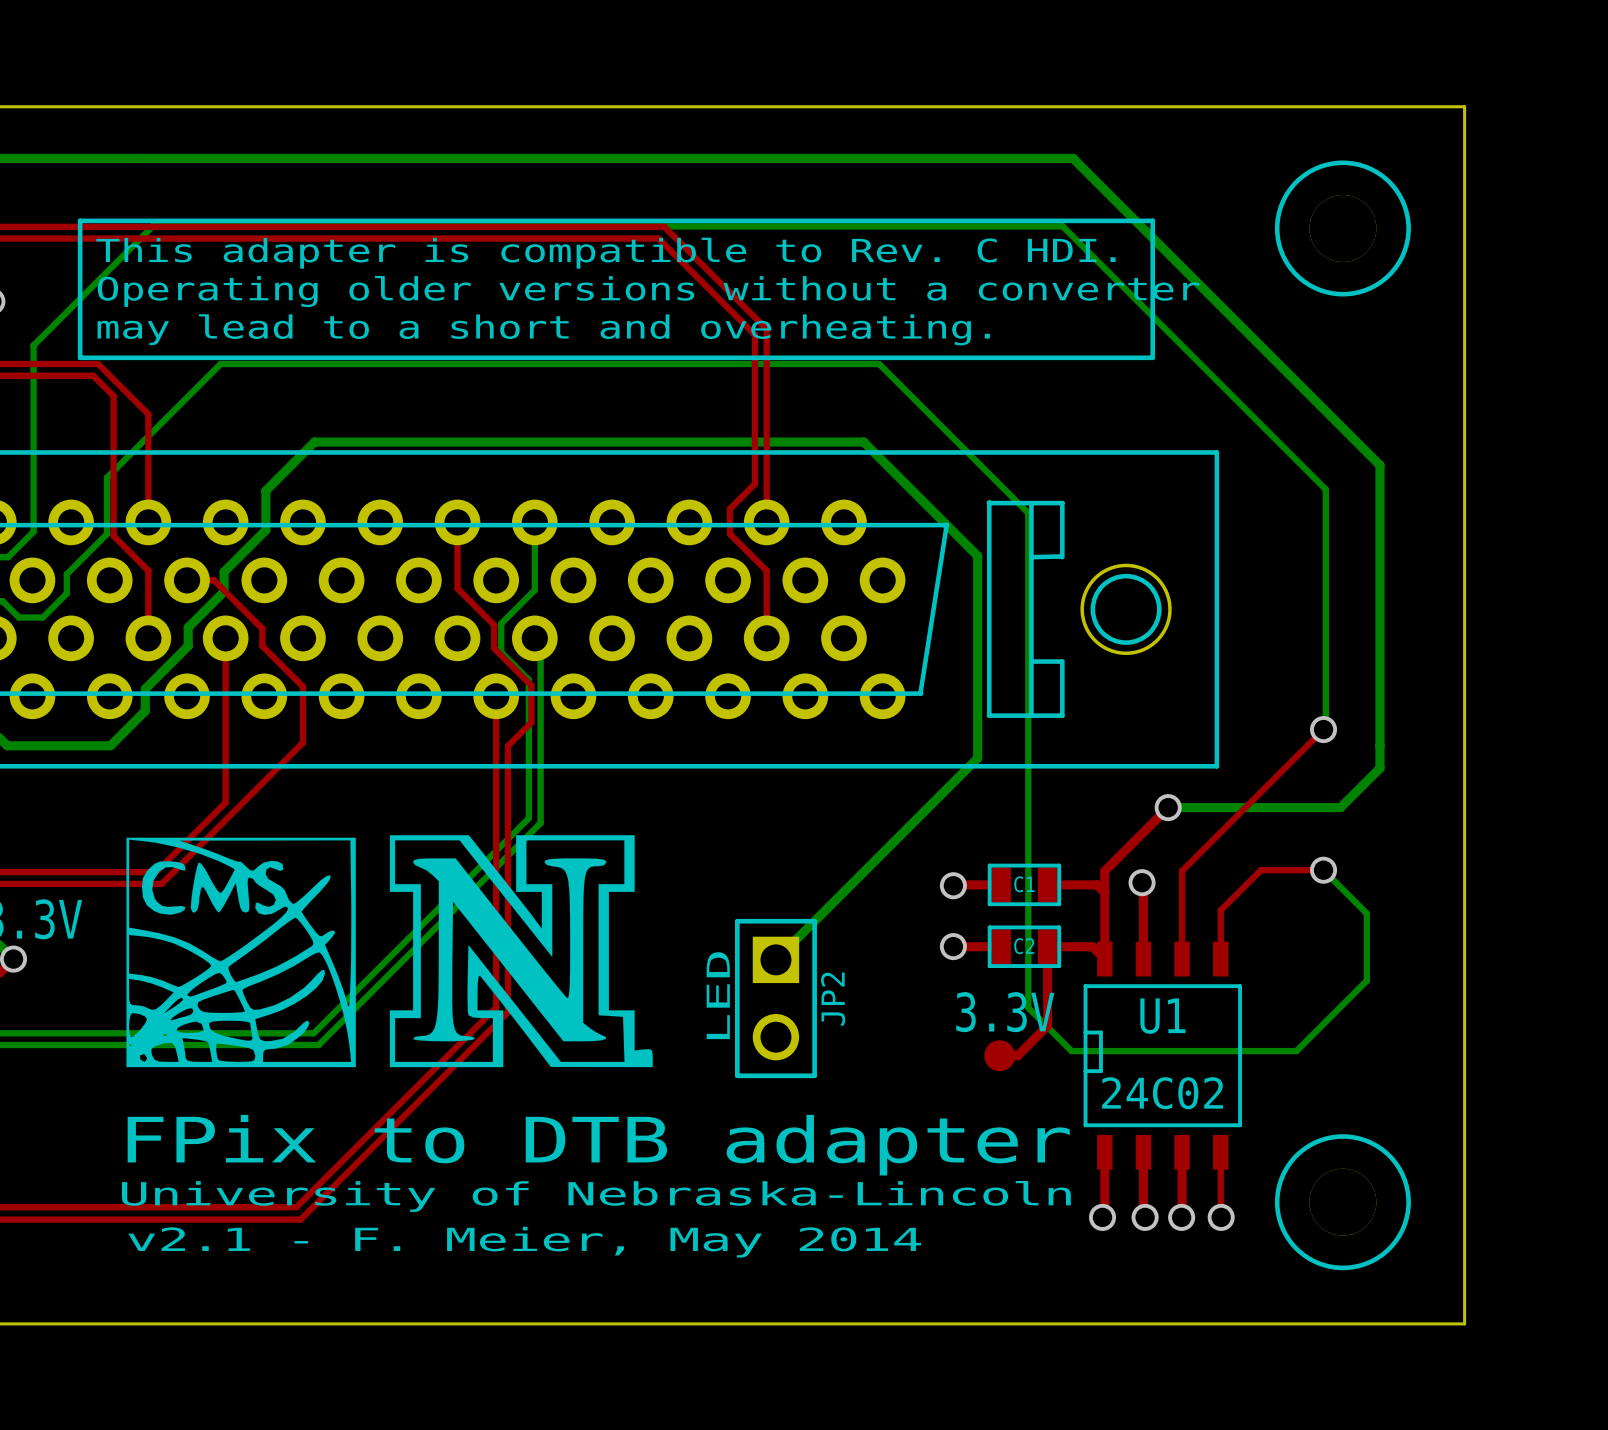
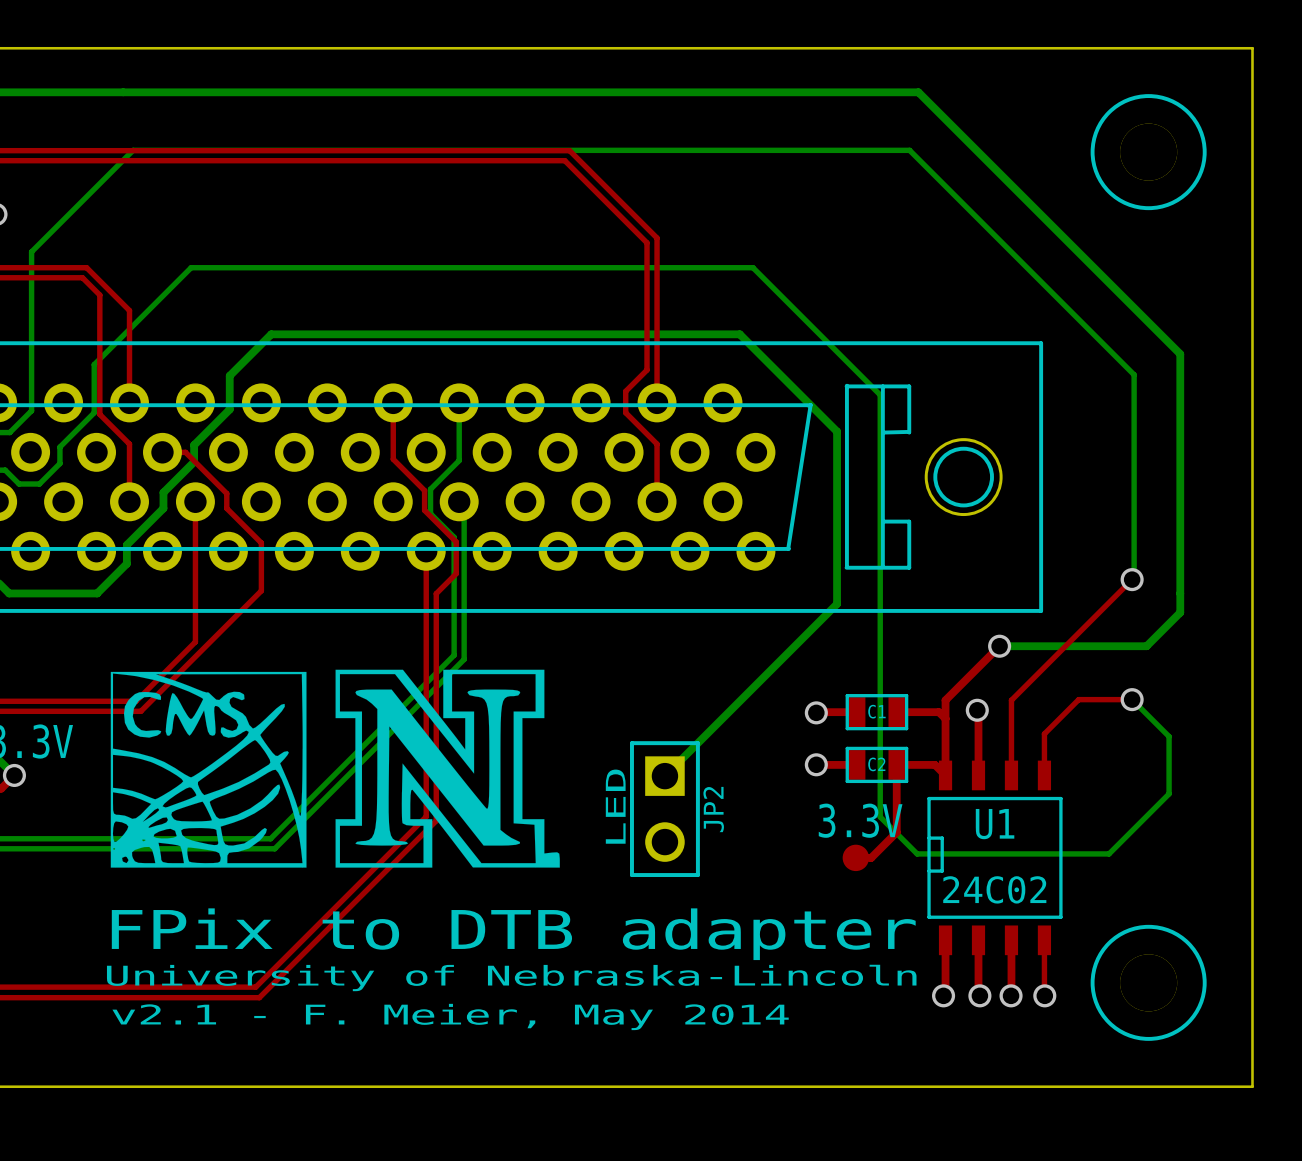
line: (80, 220) (80, 357) (1152, 357) (1152, 220) (80, 220) -> none
text: This adapter is compatible to Rev. C HDI. (605, 253) -> none
text: Operating older versions without a converter (648, 291) -> none
text: may lead to a short and overheating. (543, 329) -> none

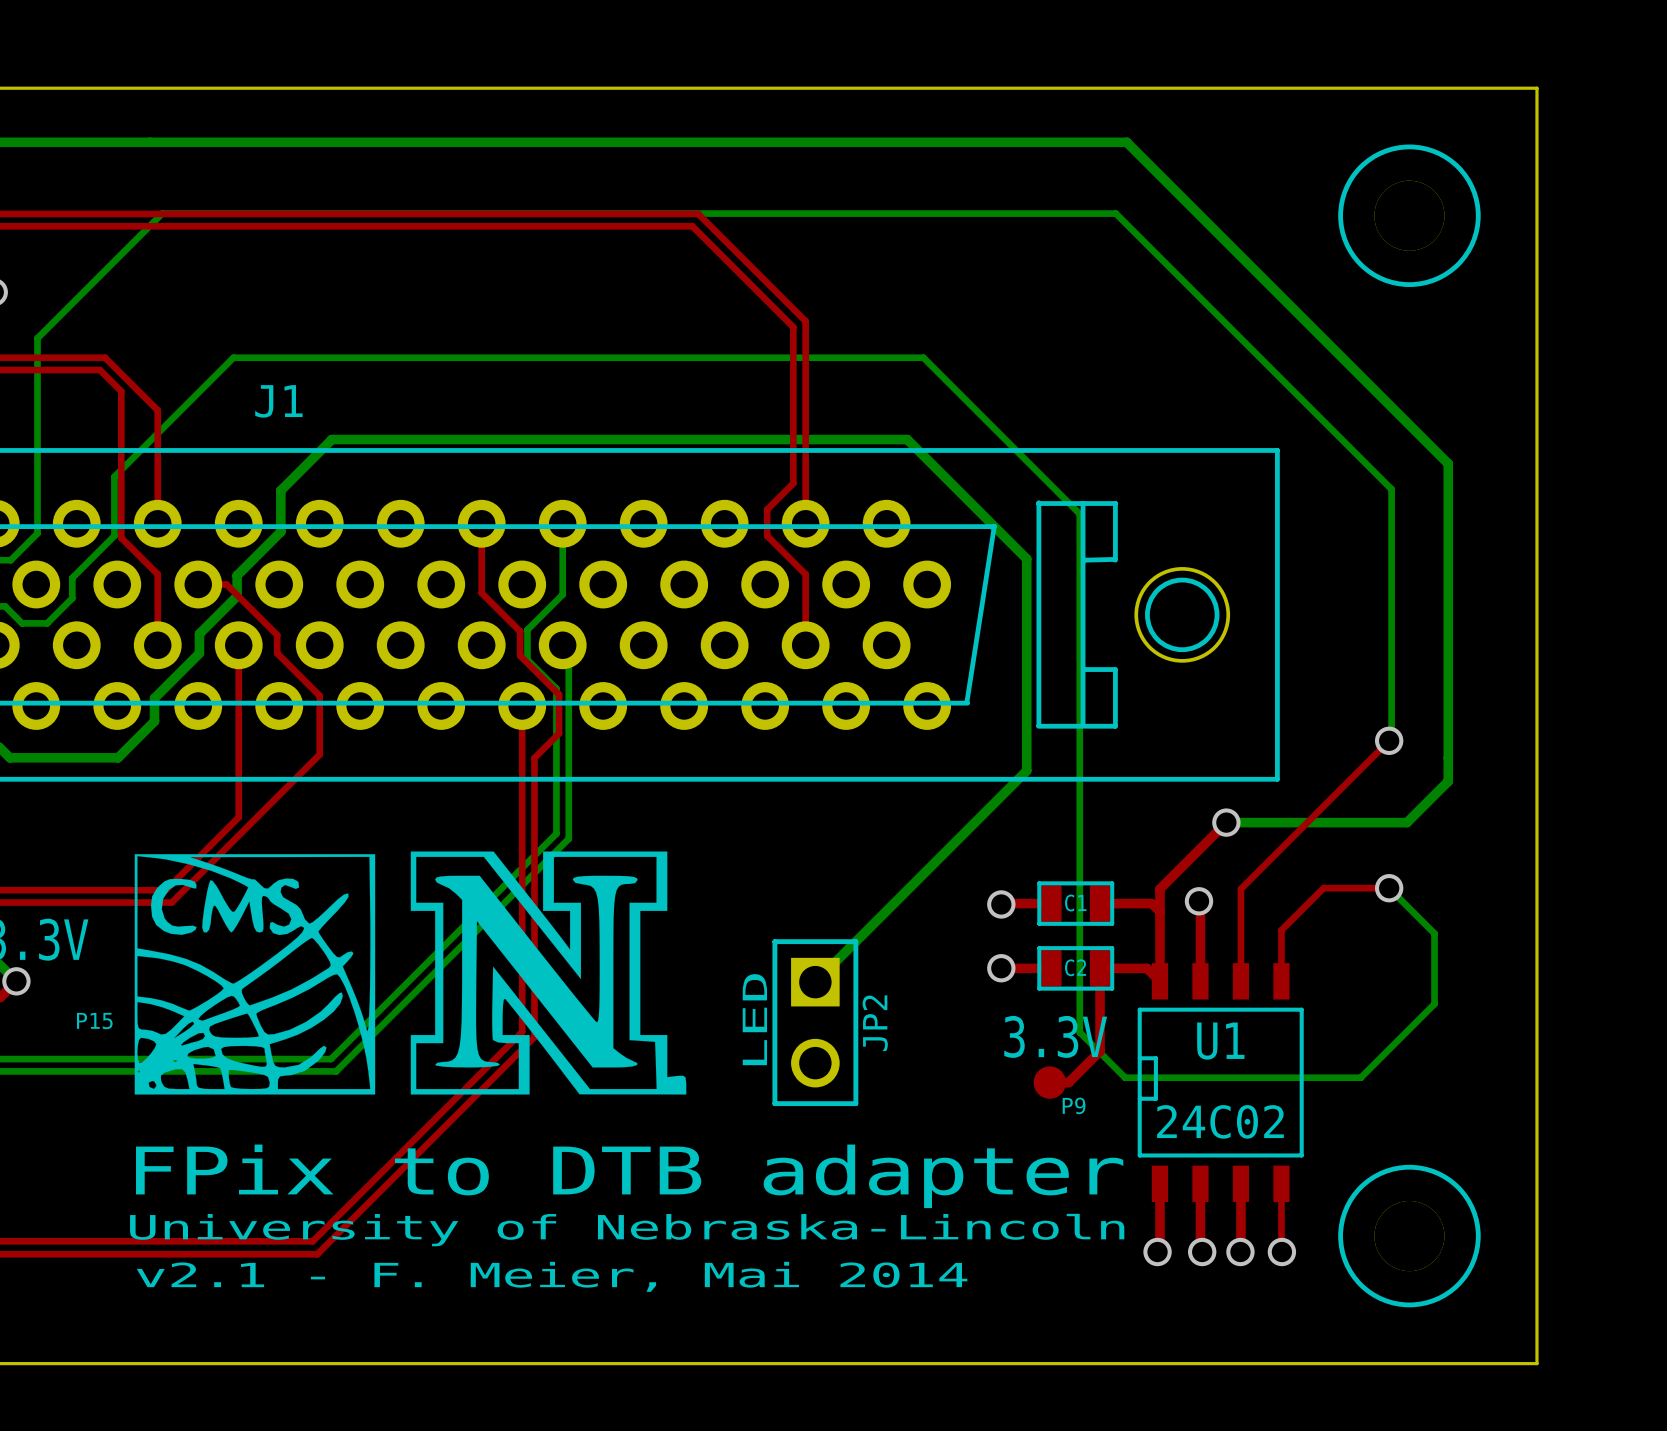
J1 name: none -> J1 (278, 401)
P15 name: none -> P15 (94, 1021)
P9 name: none -> P9 (1074, 1105)
text: v2.1 - F. Meier, May 2014 (450, 1016) -> v2.1 - F. Meier, Mai 2014 (552, 1276)

